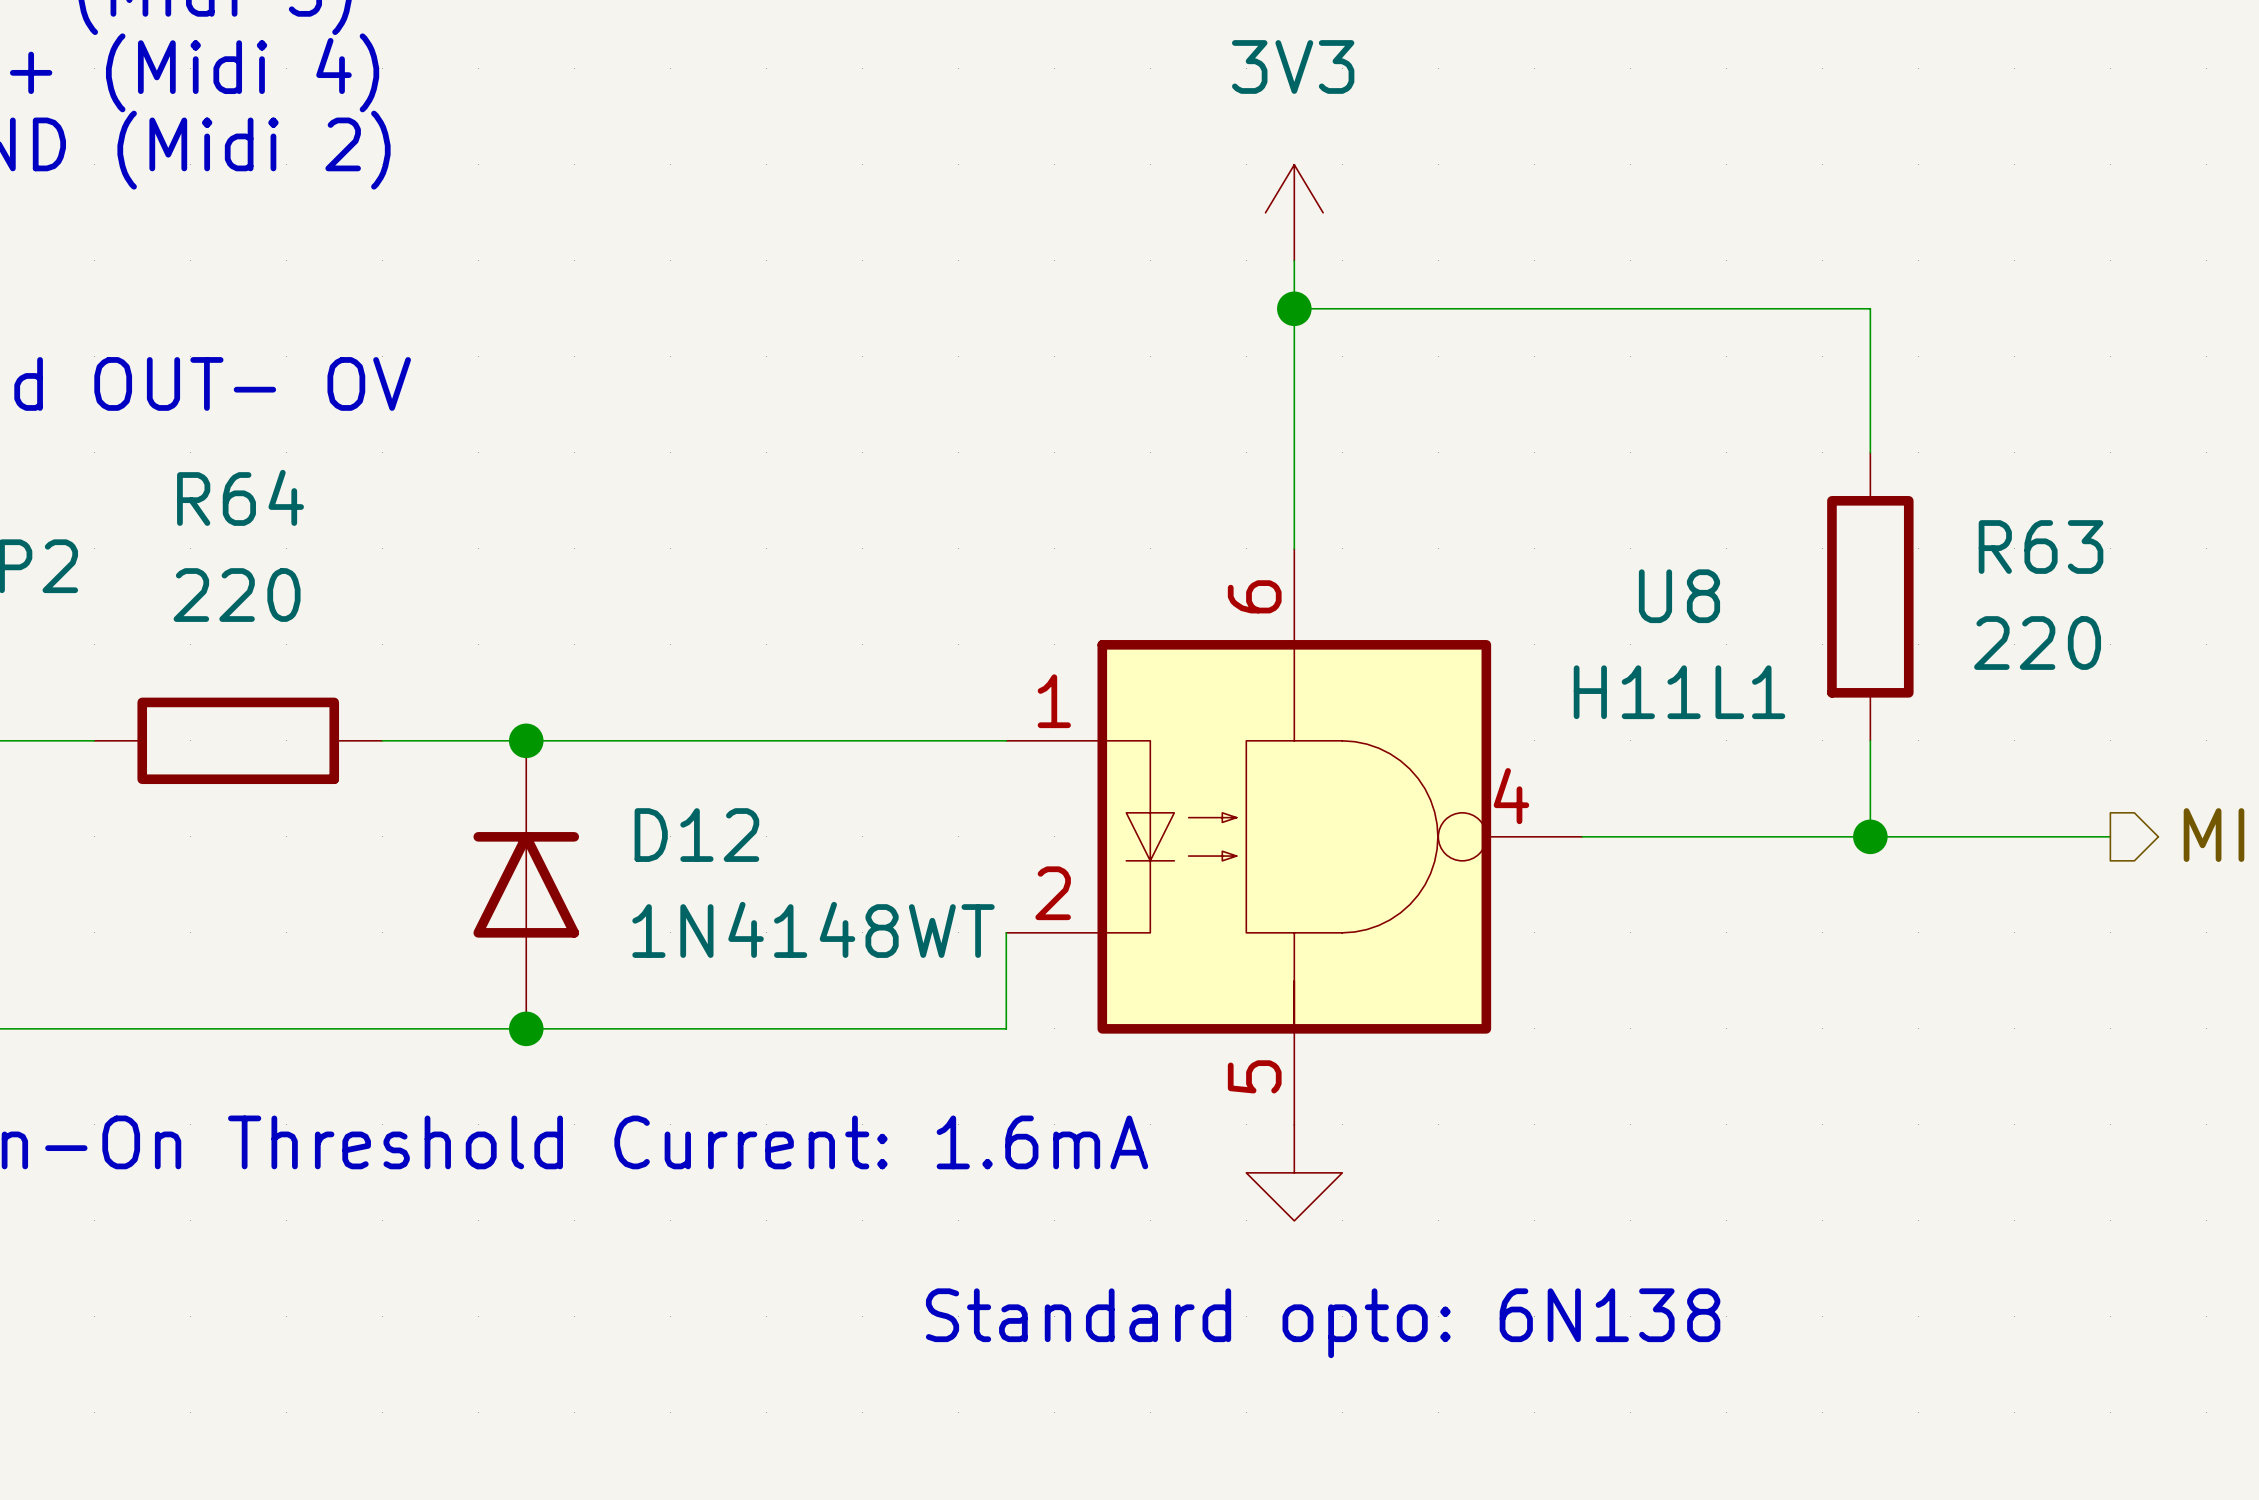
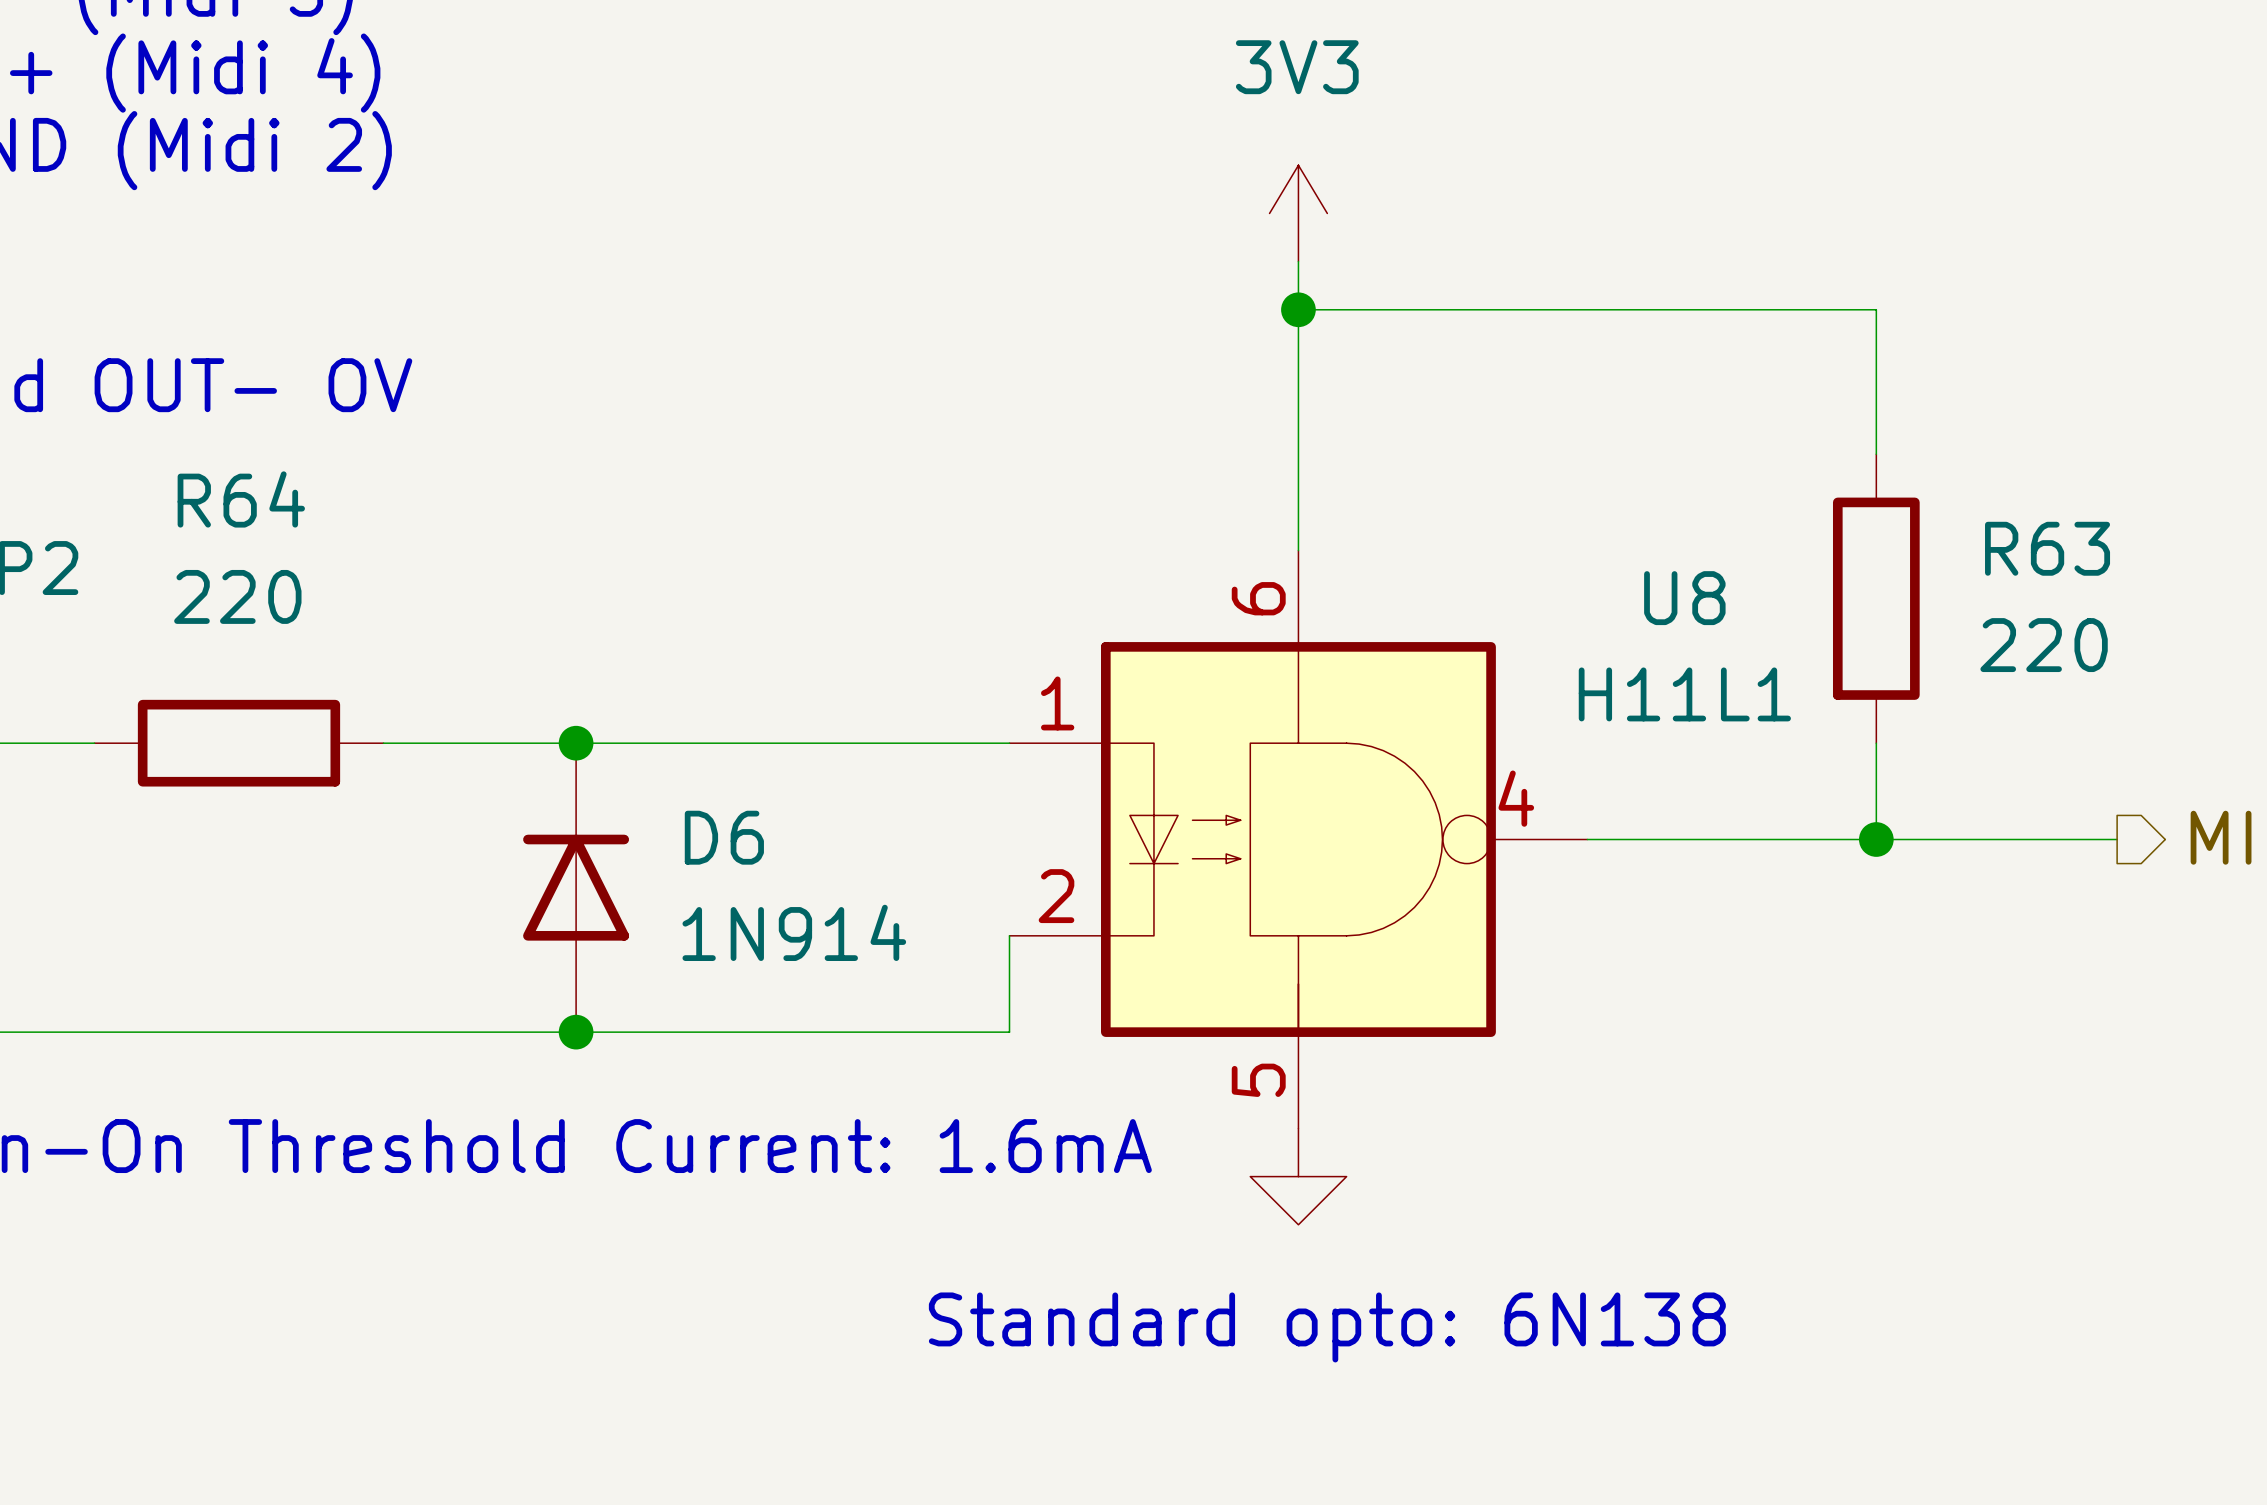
junction position: (526, 740) -> (576, 743)
D12: 1N4148WT (526, 884) -> none
D6: none -> 1N914 (576, 887)
junction position: (526, 1028) -> (576, 1032)

